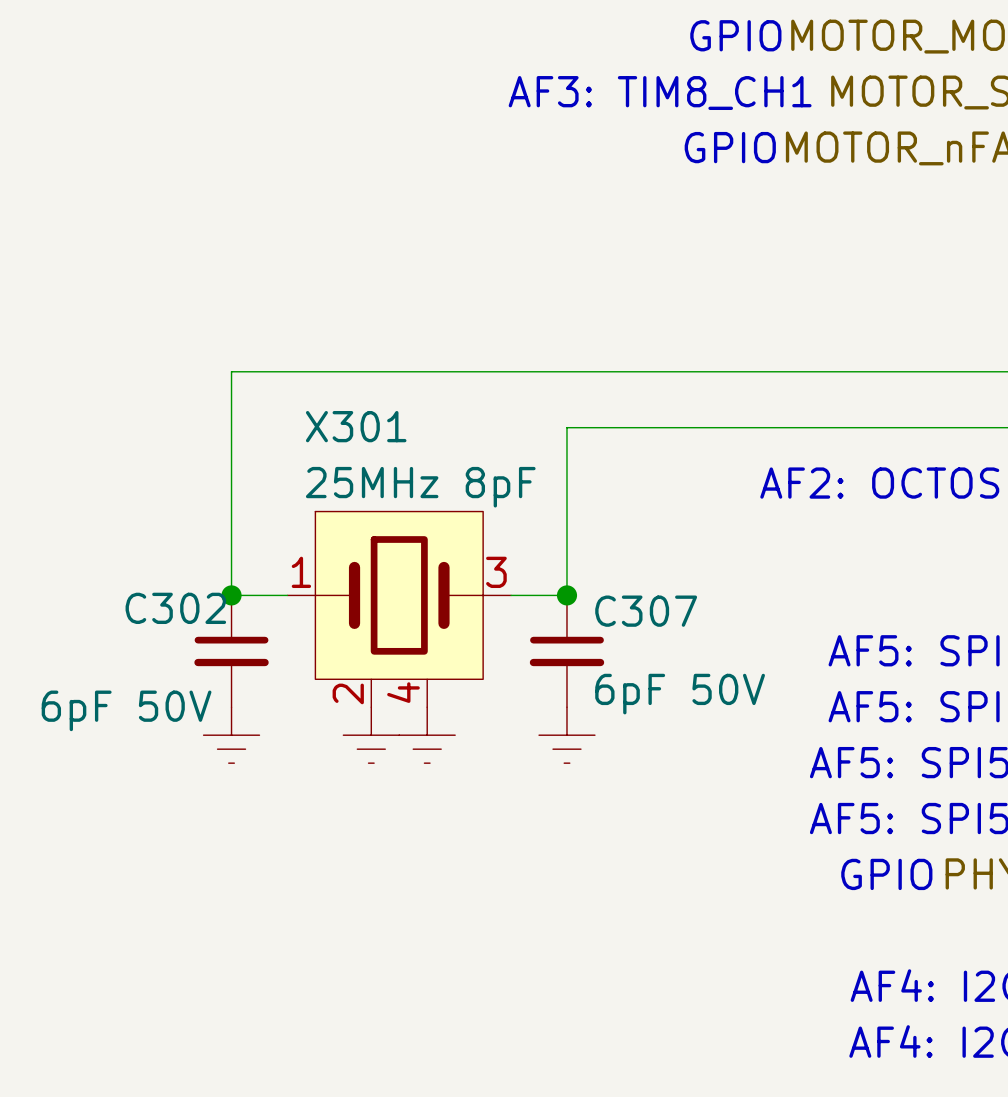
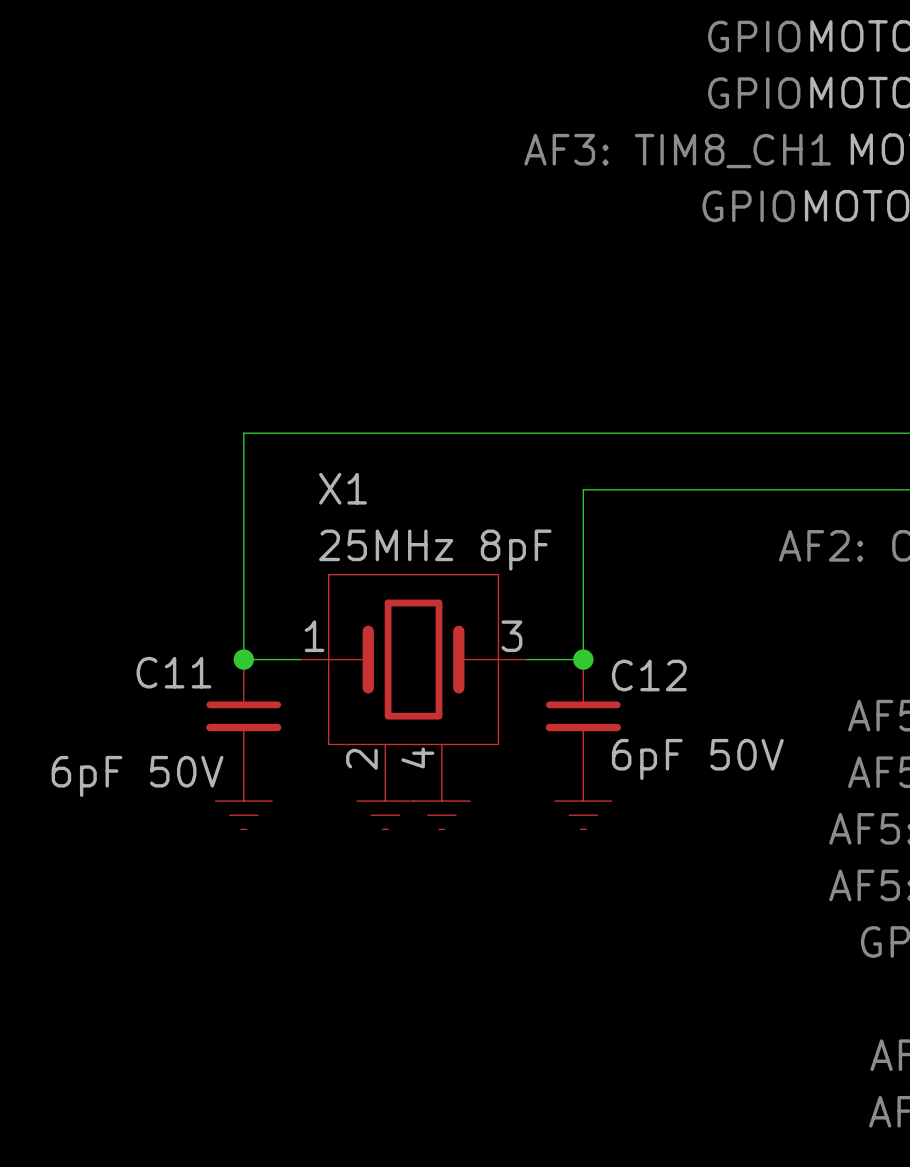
X301 name: X301 (356, 426) -> X1 (343, 488)
C302 name: C302 (175, 608) -> C11 (173, 672)
C307 name: C307 (646, 611) -> C12 (649, 675)

